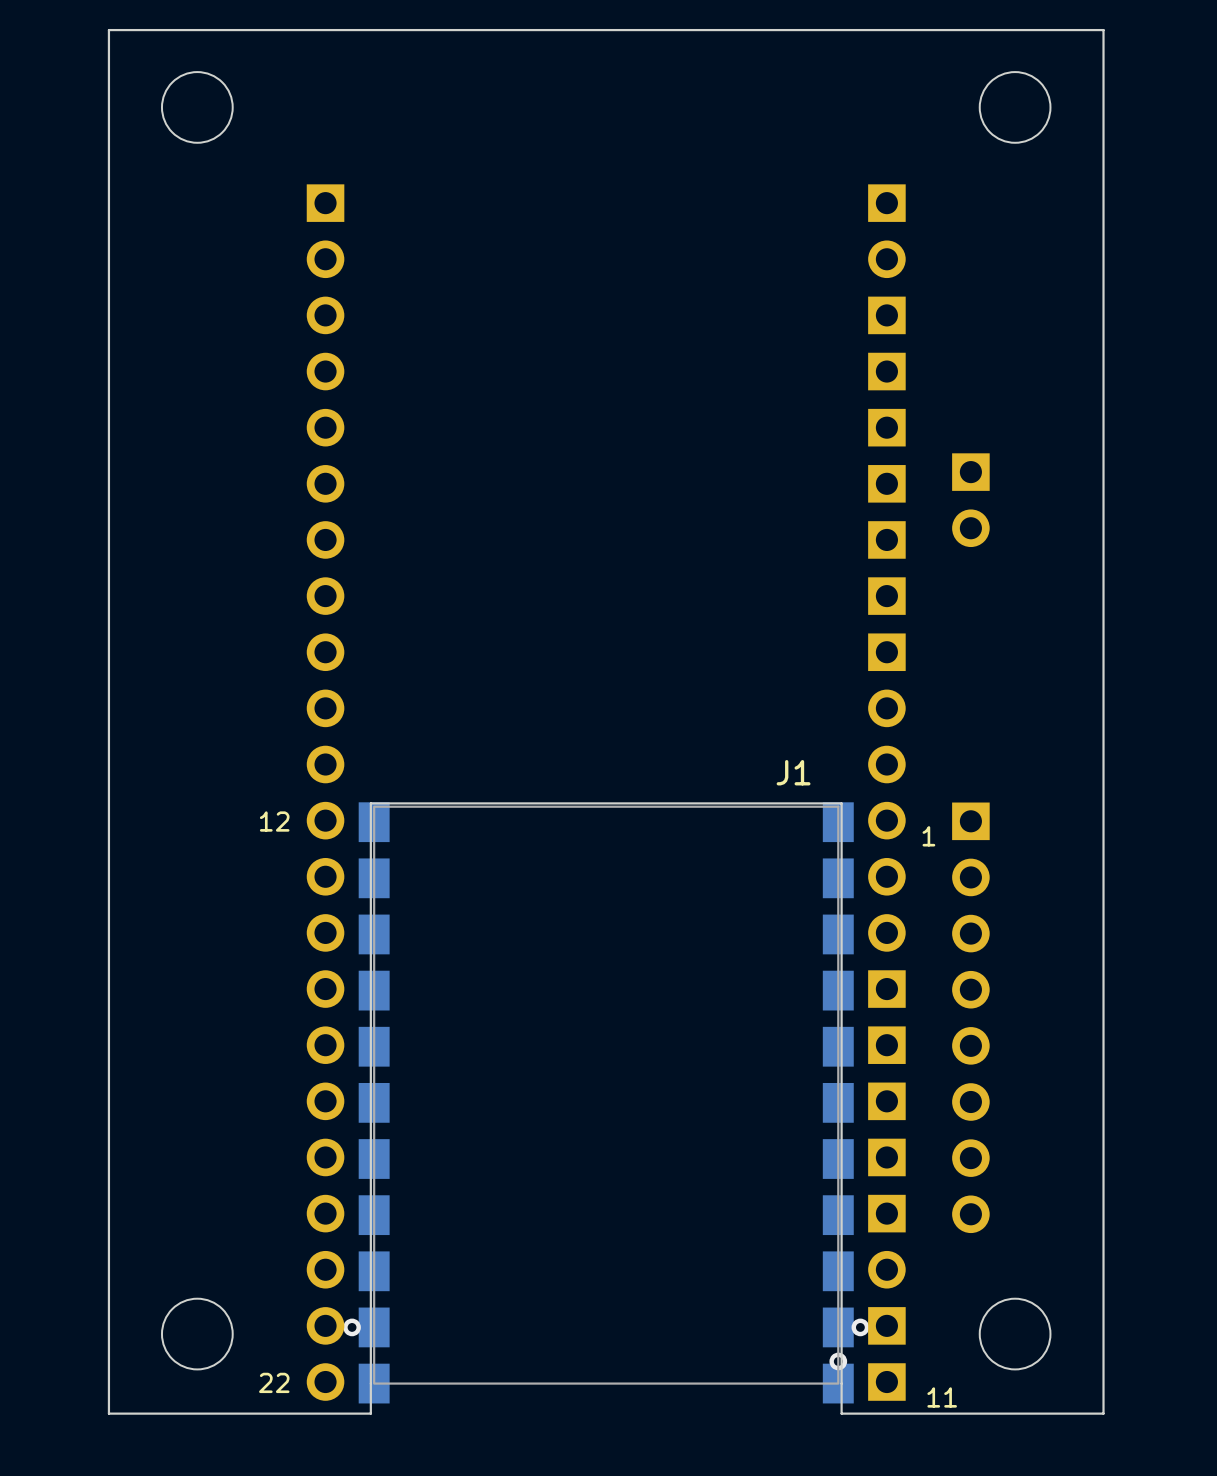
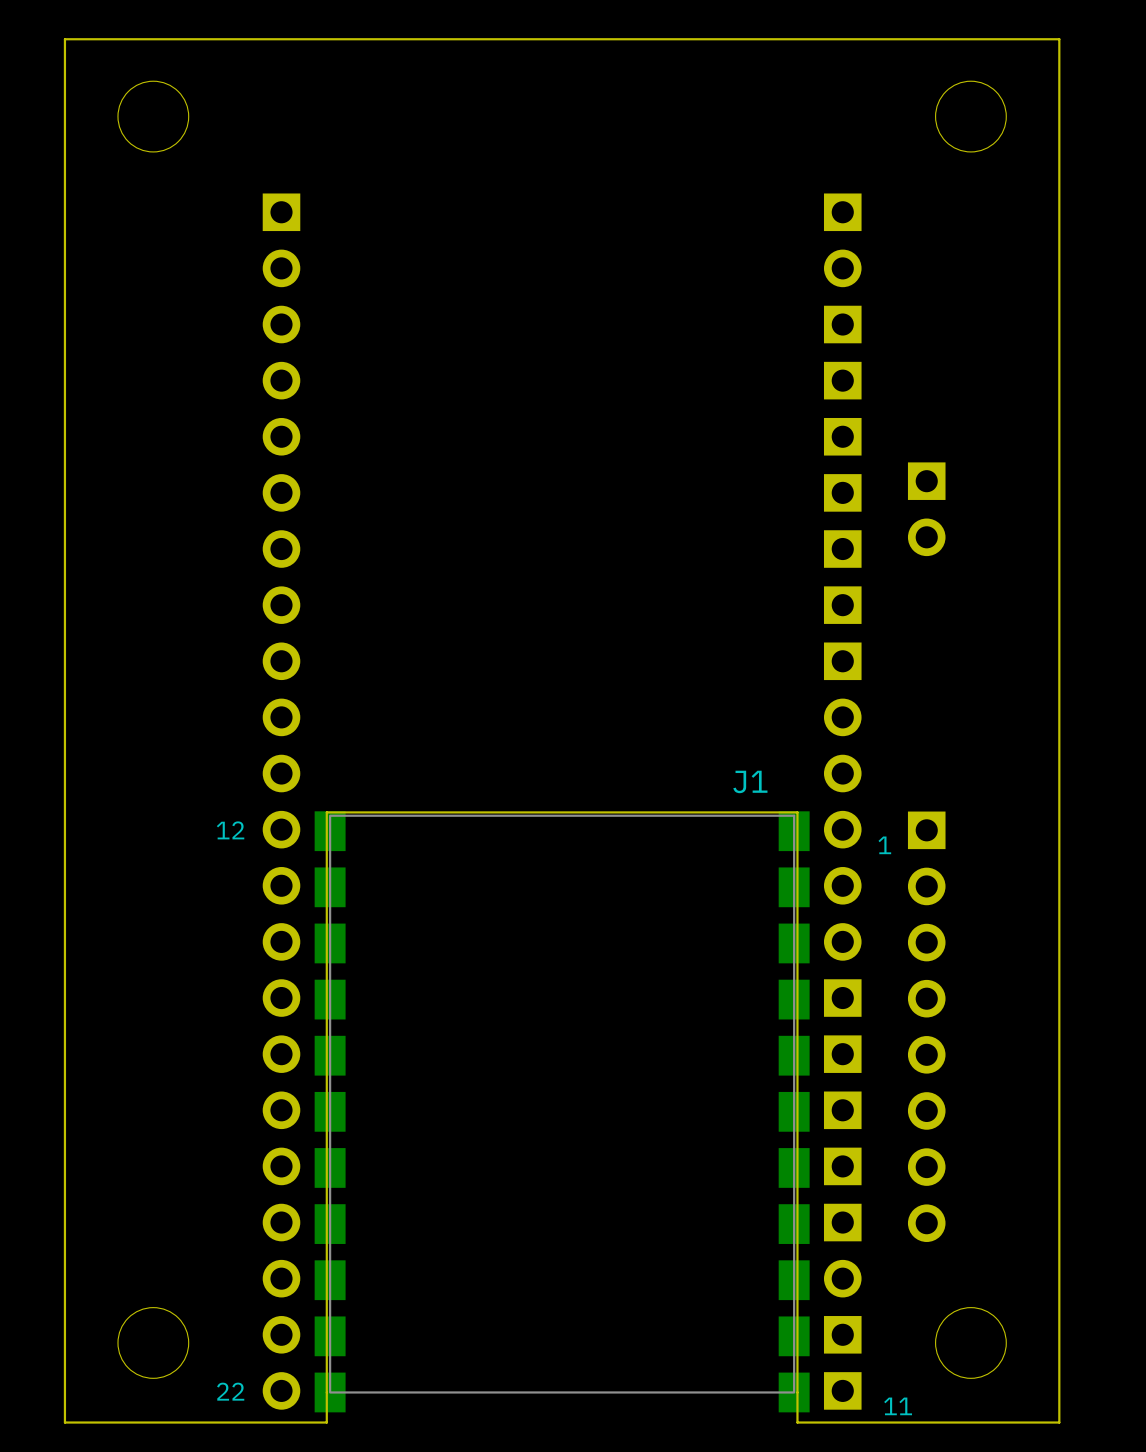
via: (352, 1327) -> none
via: (860, 1327) -> none
via: (838, 1361) -> none

